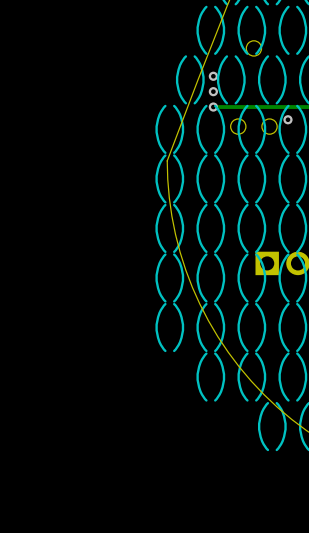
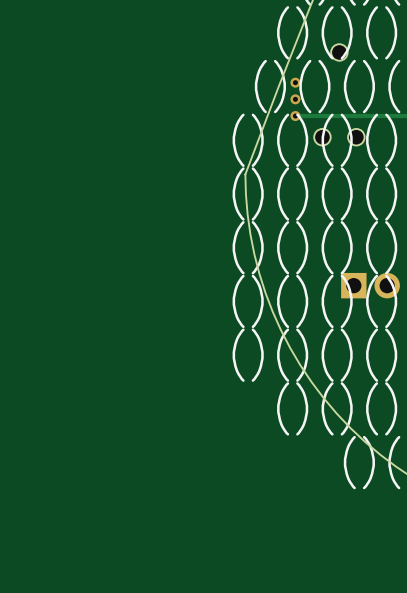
via: (287, 119) -> none

